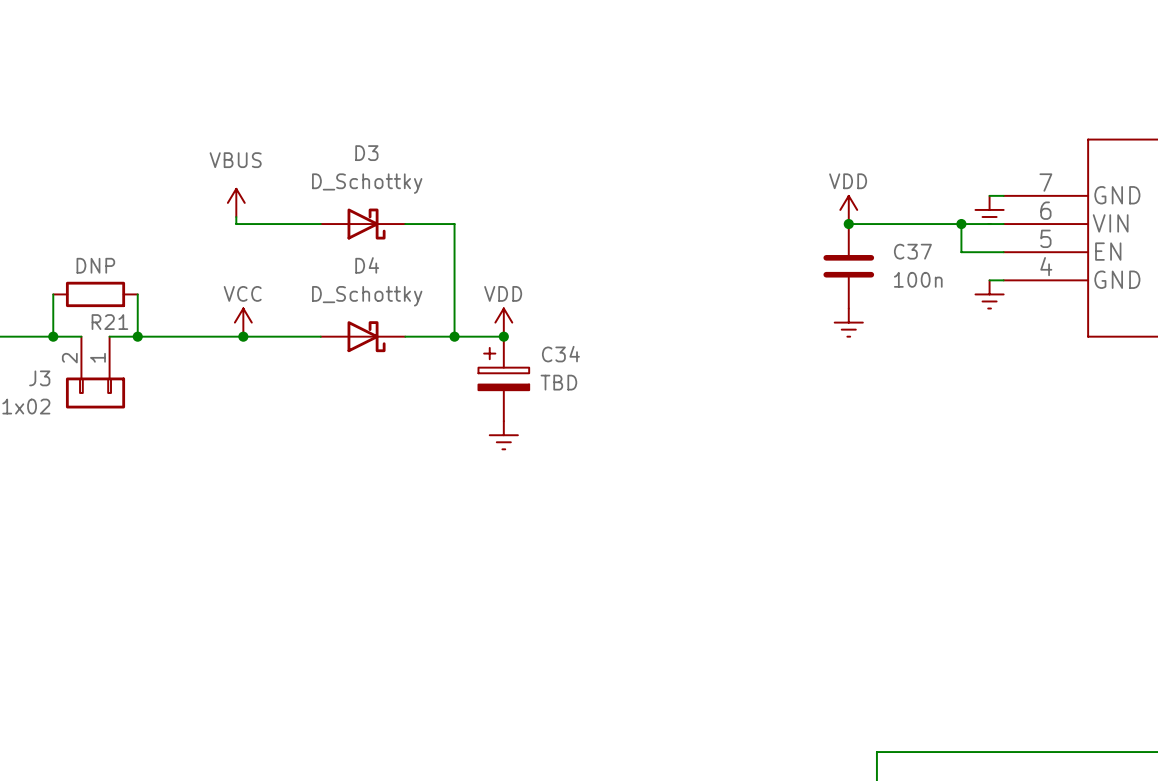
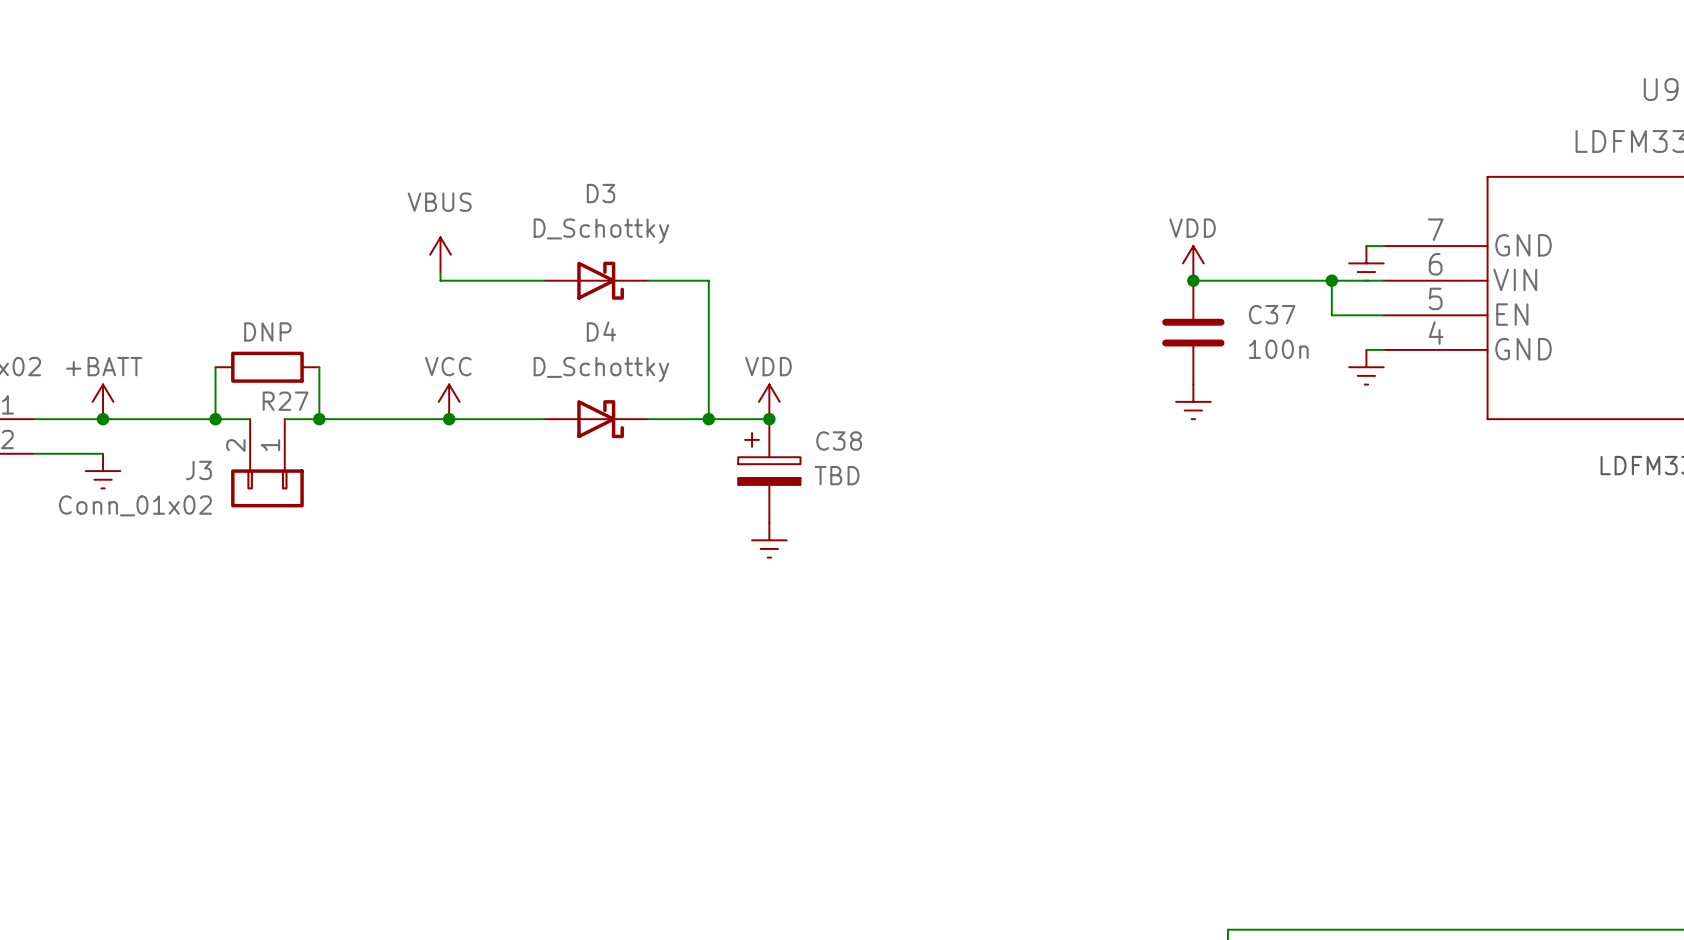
R21 name: R21 (109, 322) -> R27 (285, 401)
C34 name: C34 (560, 354) -> C38 (839, 441)

